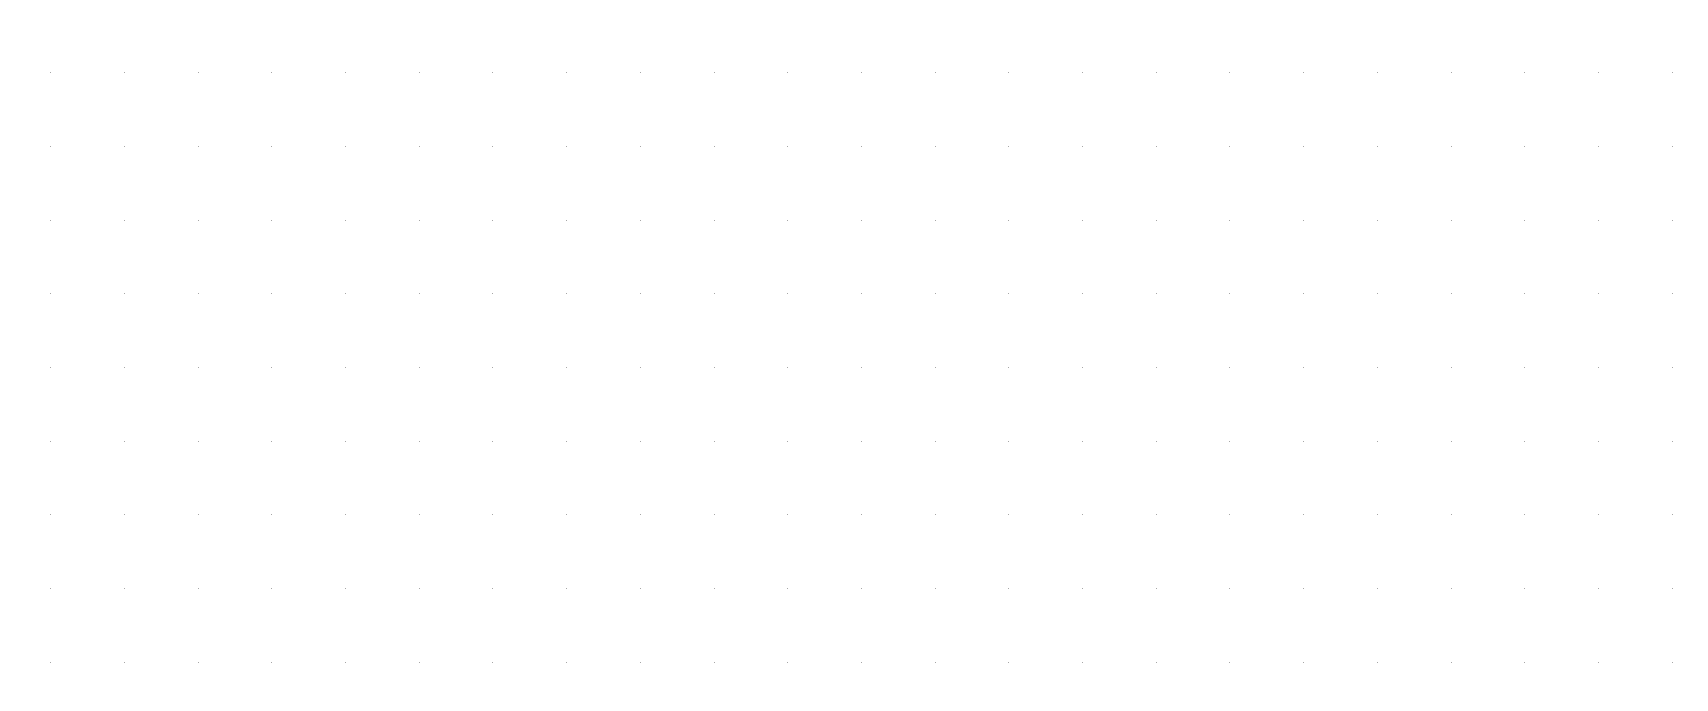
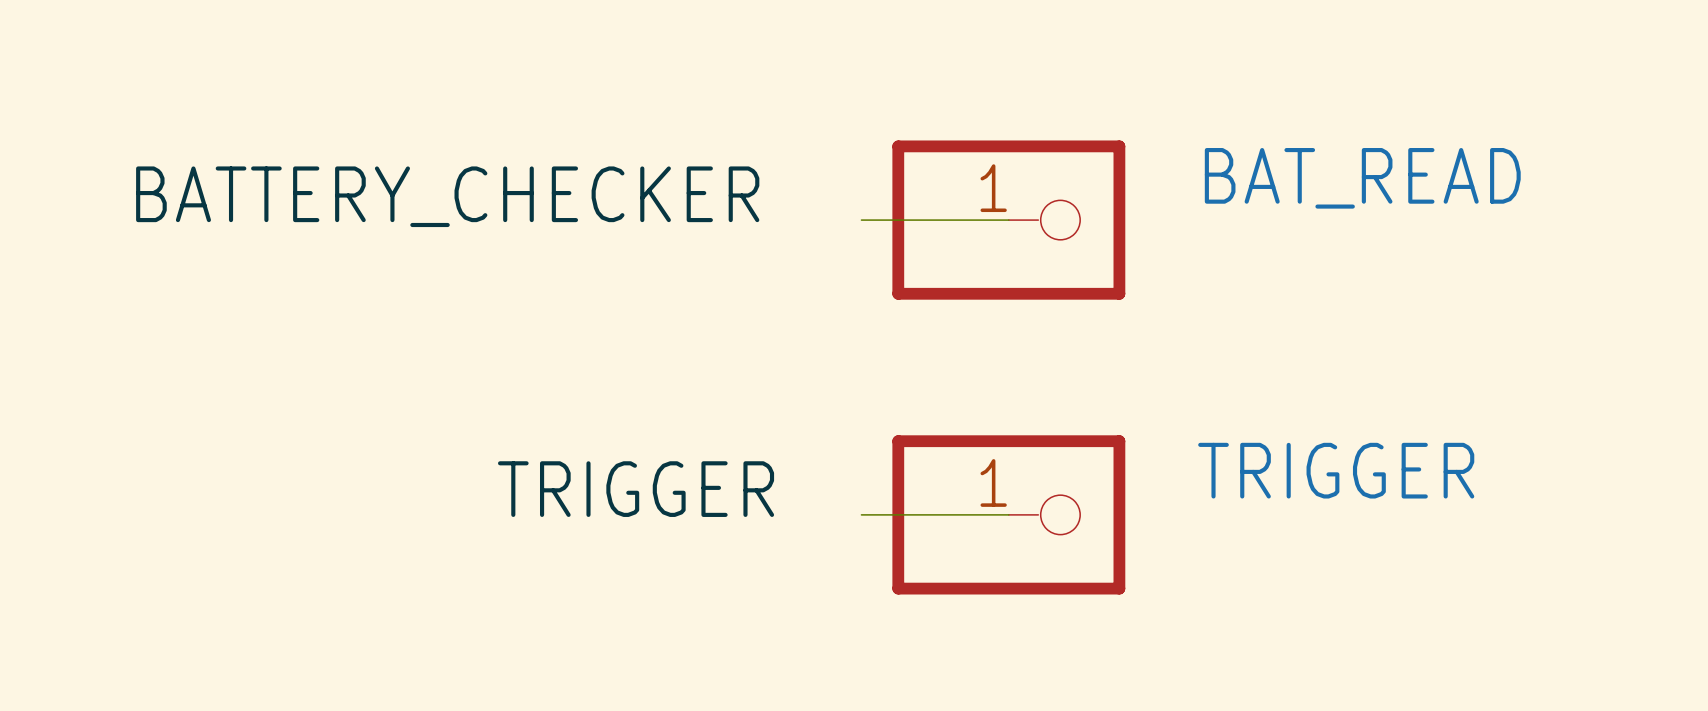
label: none -> BATTERY_CHECKER (447, 196)
wire: none -> (861, 220) (1008, 220)
BAT_READ: none -> (1008, 220)
label: none -> TRIGGER (636, 489)
wire: none -> (861, 514) (1008, 514)
TRIGGER: none -> (1008, 514)

